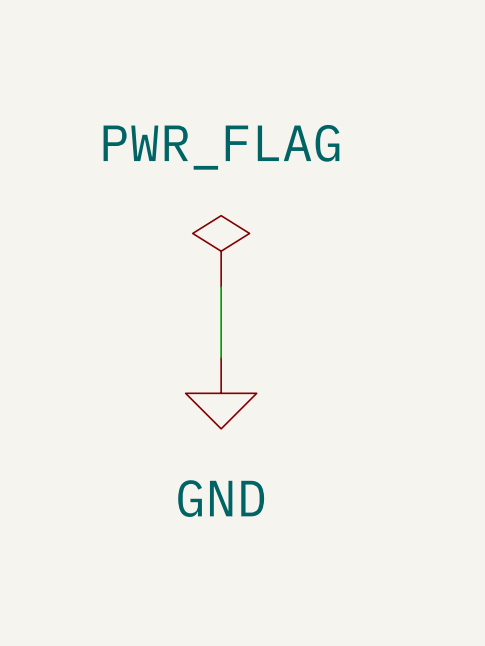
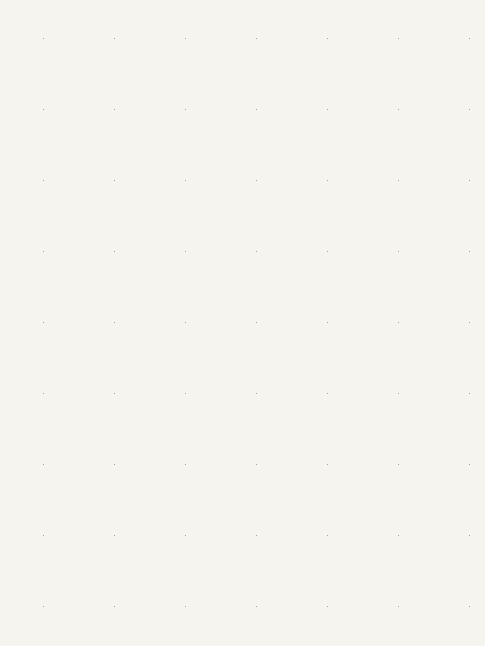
power symbol: PWR_FLAG (221, 251) -> none
wire: (221, 286) (221, 357) -> none
power symbol: GND (221, 393) -> none

